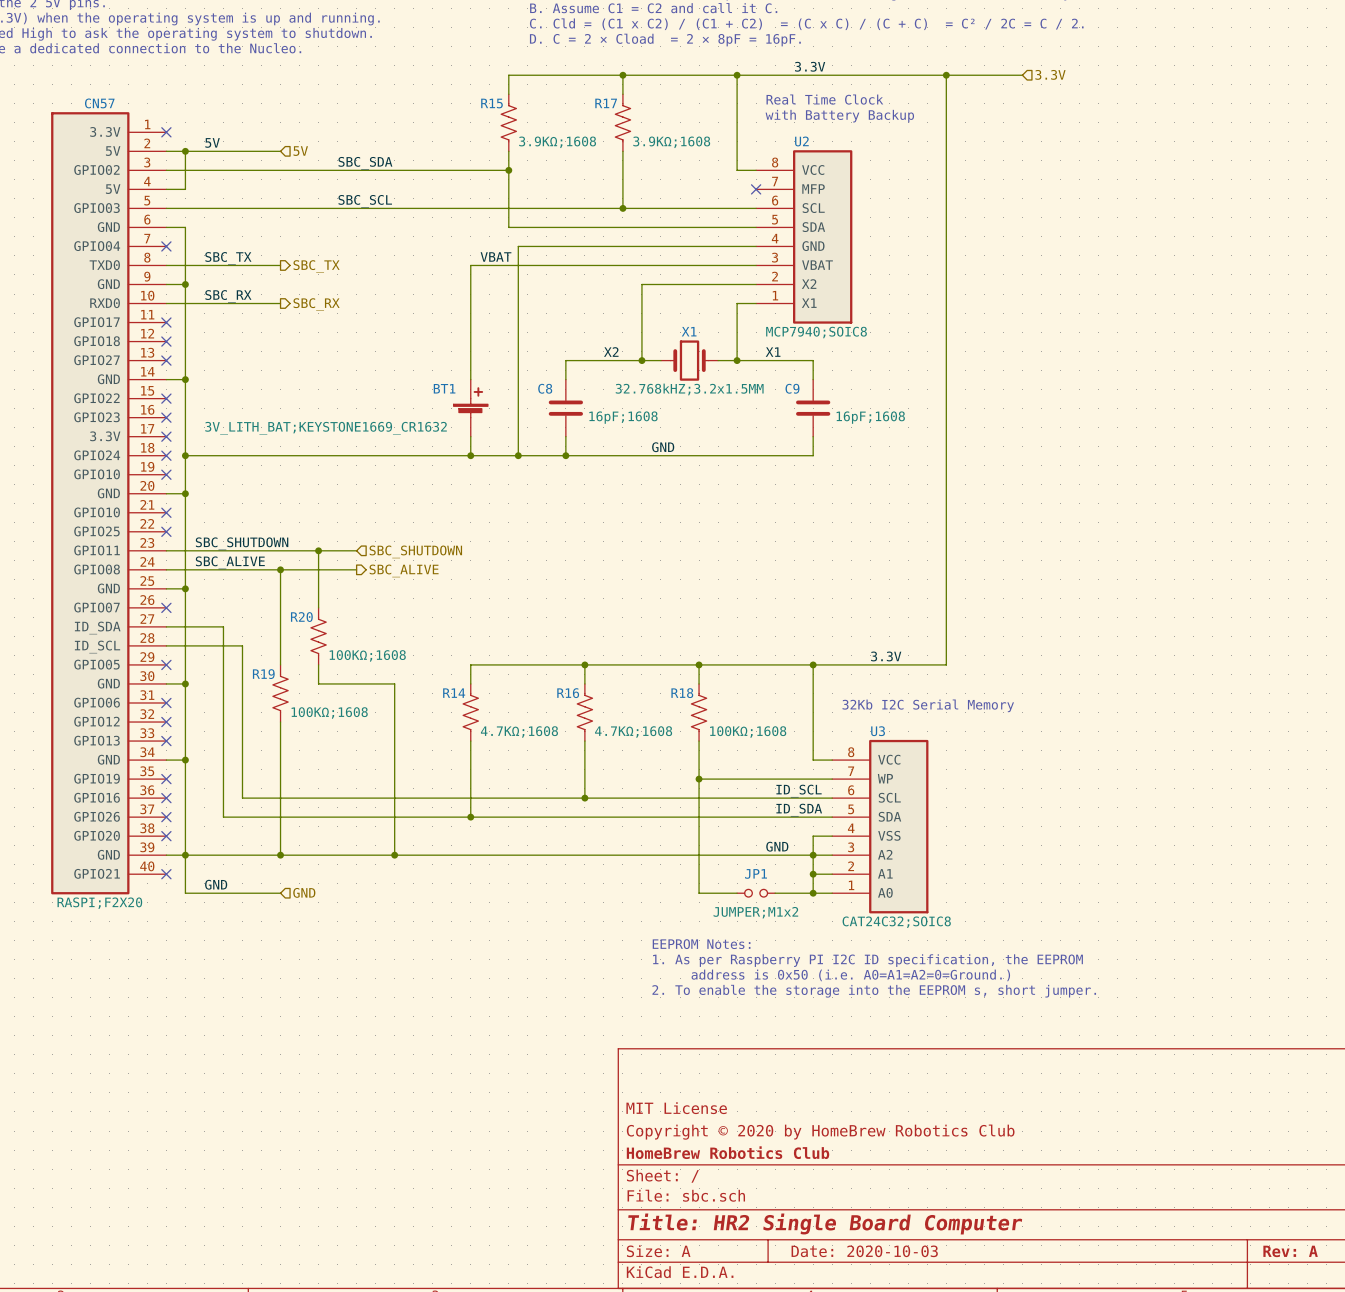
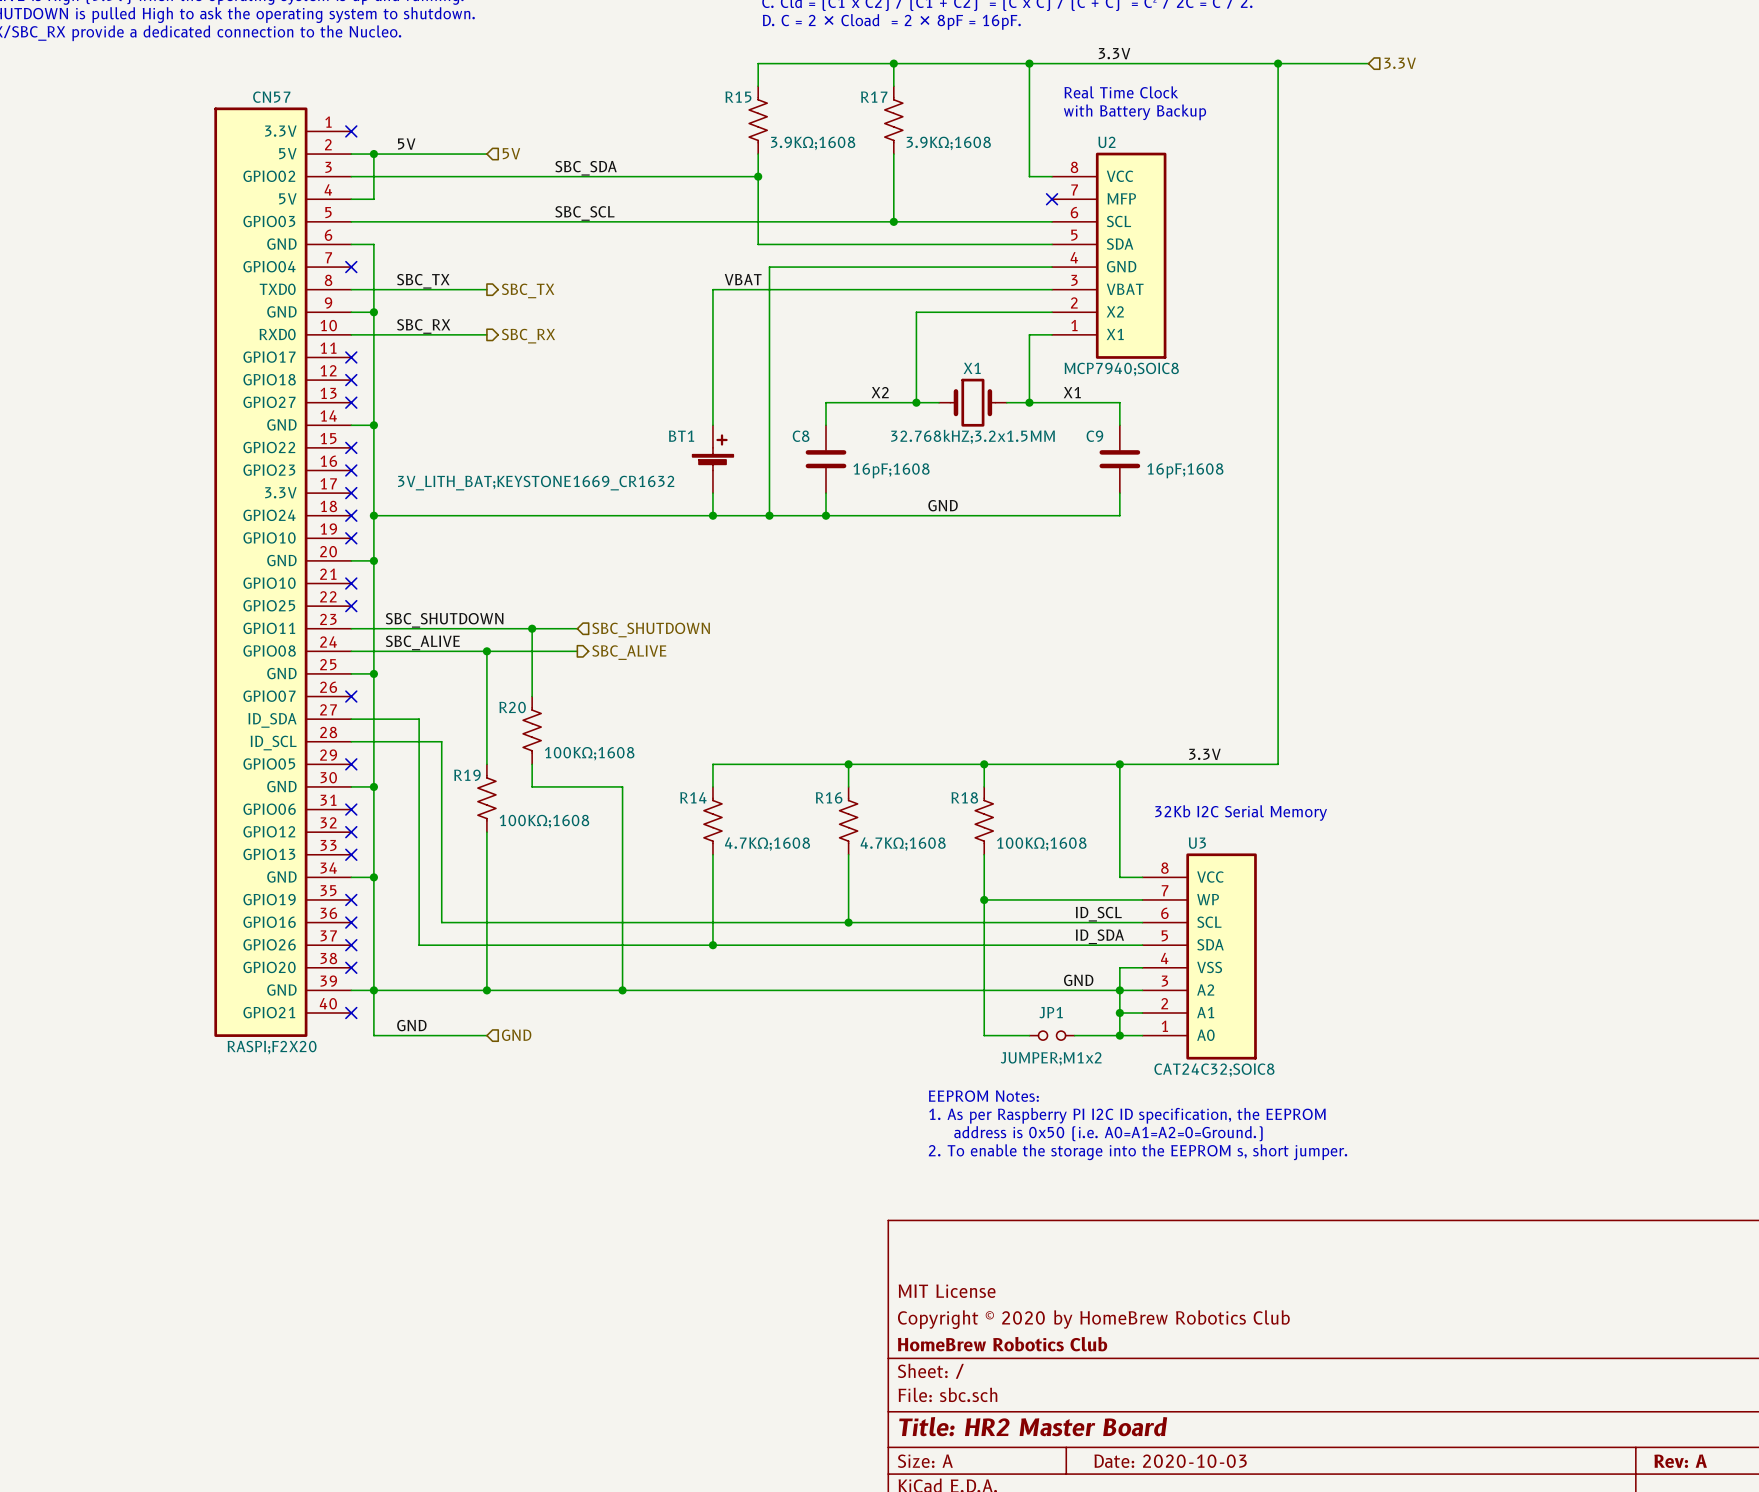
title block: Title: HR2 Single Board Computer (825, 1223) -> Title: HR2 Master Board (1033, 1426)

